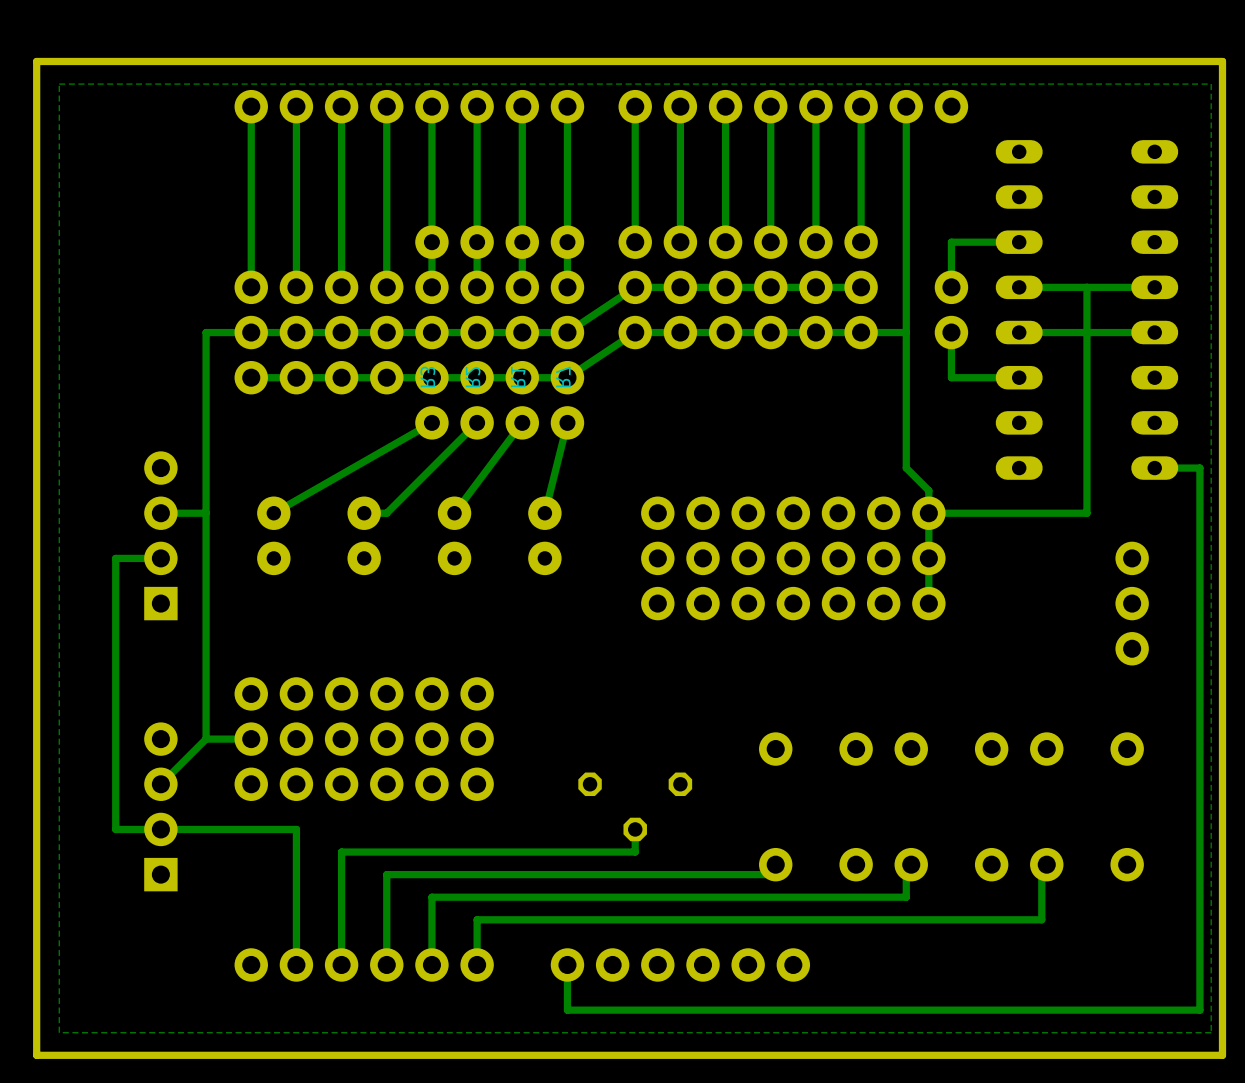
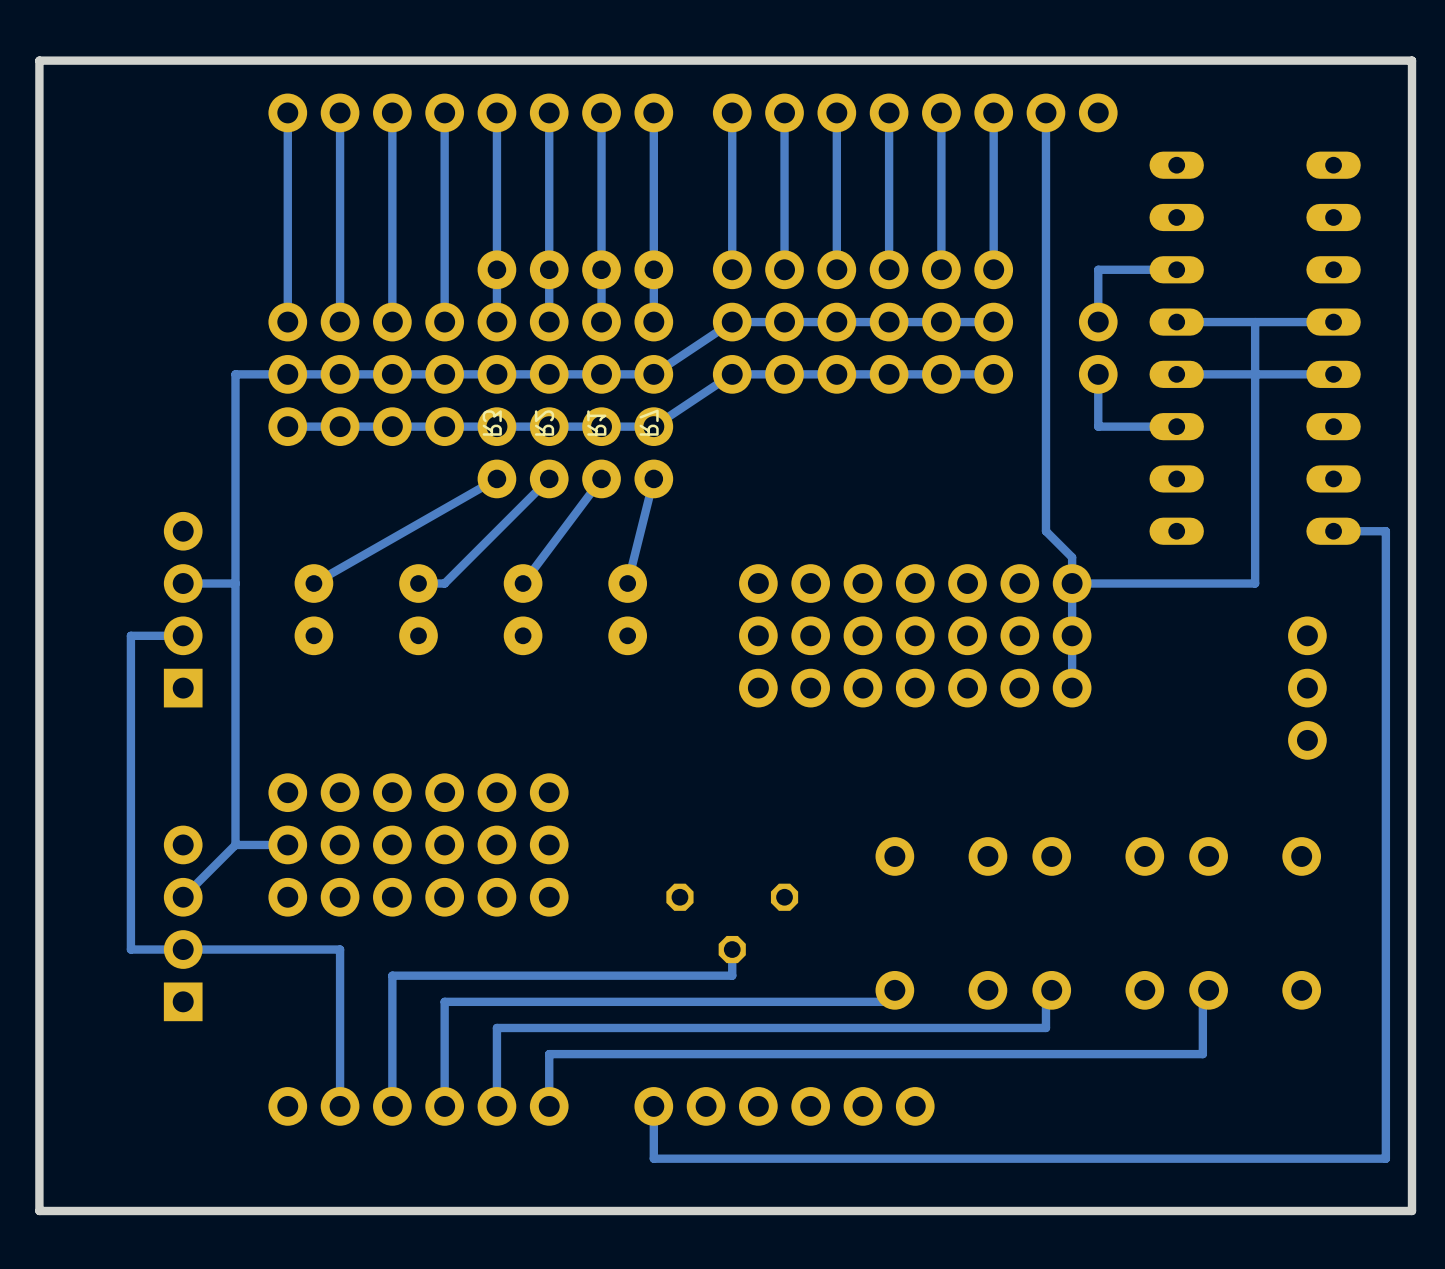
zone outline: (1211, 84) (1211, 1032) (59, 1032) (59, 84) (1211, 84) -> none
track: (906, 332) (861, 332) -> none

